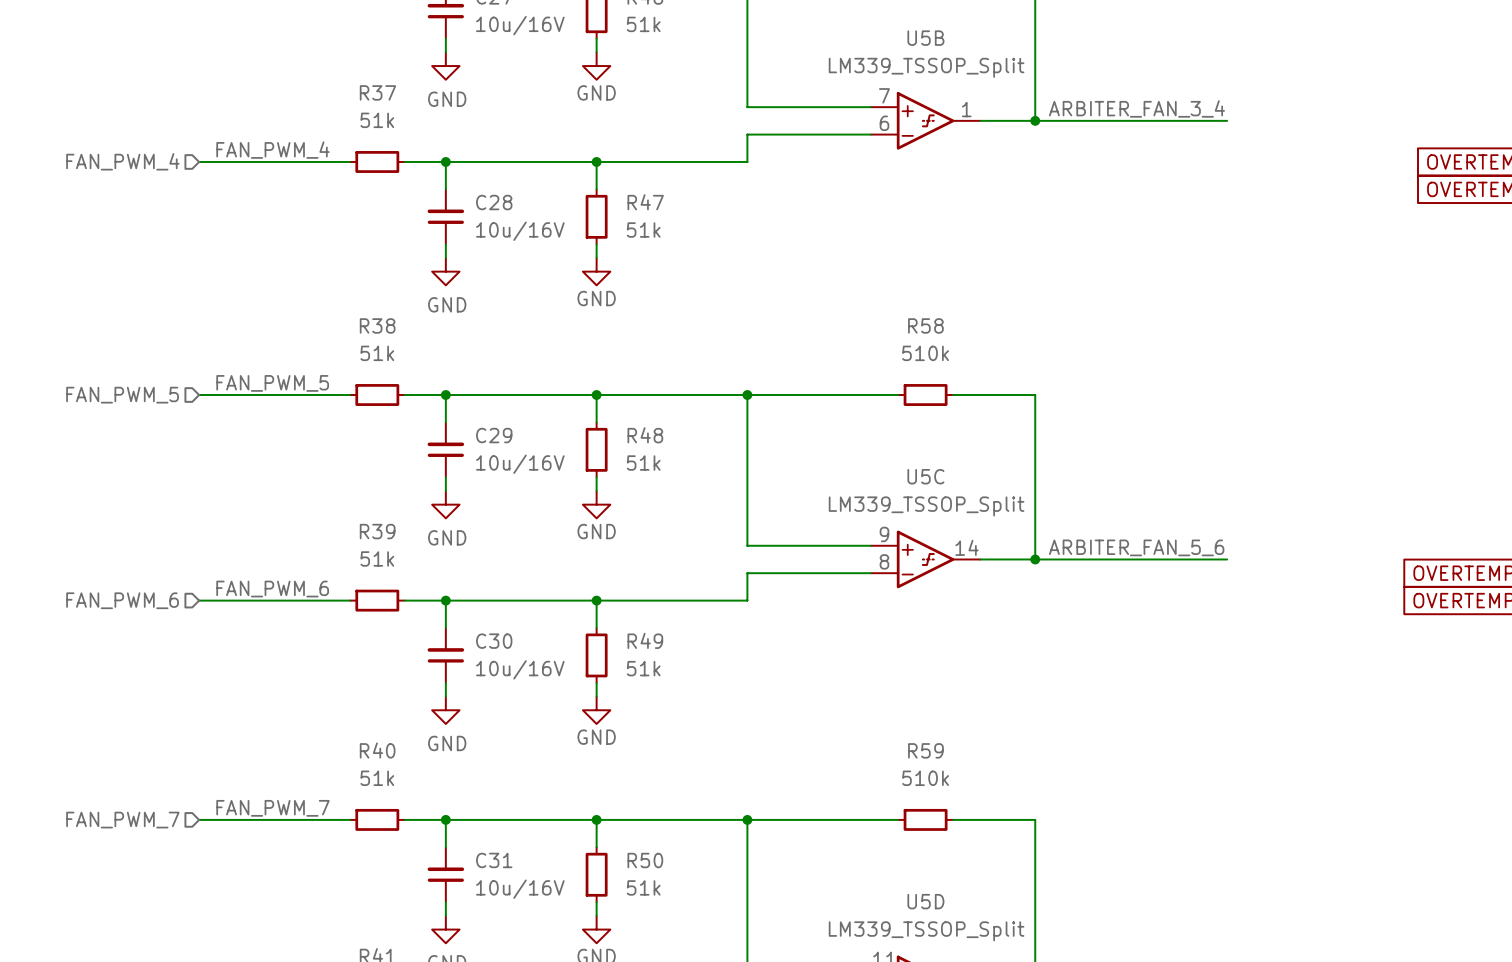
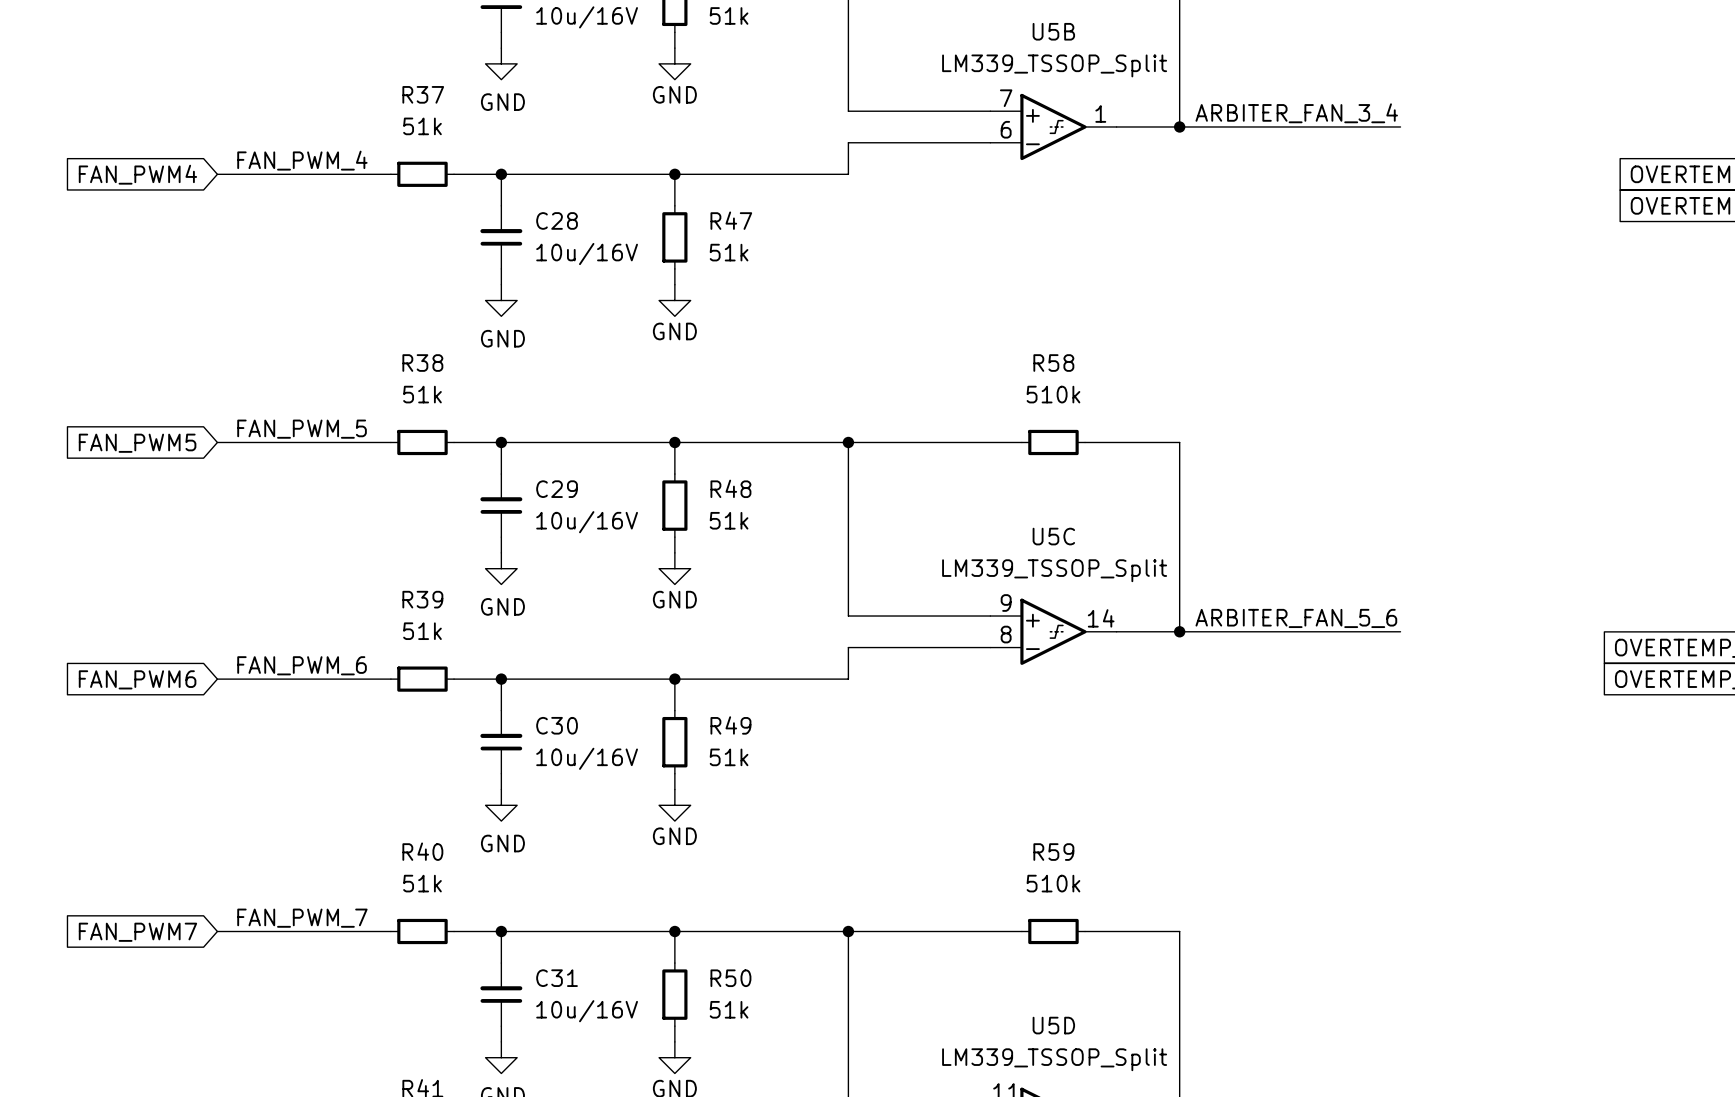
hierarchical label: FAN_PWM_4 (122, 161) -> none
global label: none -> FAN_PWM4 (137, 174)
hierarchical label: FAN_PWM_5 (122, 395) -> none
global label: none -> FAN_PWM5 (137, 443)
hierarchical label: FAN_PWM_6 (122, 600) -> none
global label: none -> FAN_PWM6 (137, 679)
hierarchical label: FAN_PWM_7 (122, 820) -> none
global label: none -> FAN_PWM7 (137, 932)

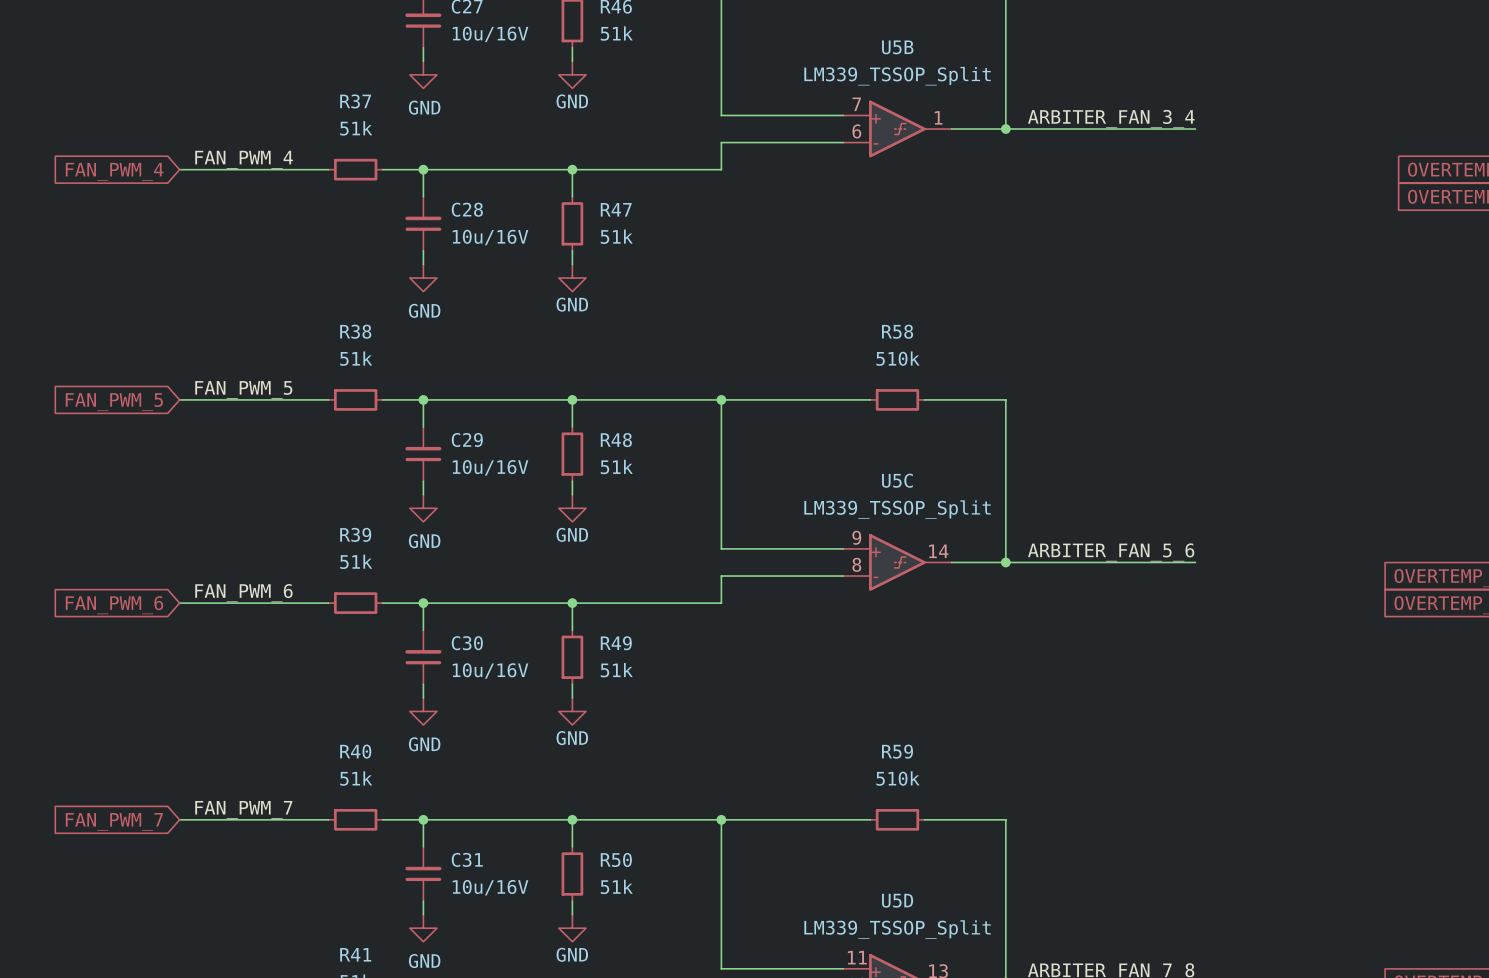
global label: FAN_PWM4 (137, 174) -> FAN_PWM_4 (114, 171)
global label: FAN_PWM5 (137, 443) -> FAN_PWM_5 (114, 402)
global label: FAN_PWM6 (137, 679) -> FAN_PWM_6 (114, 605)
global label: FAN_PWM7 (137, 932) -> FAN_PWM_7 (114, 822)

